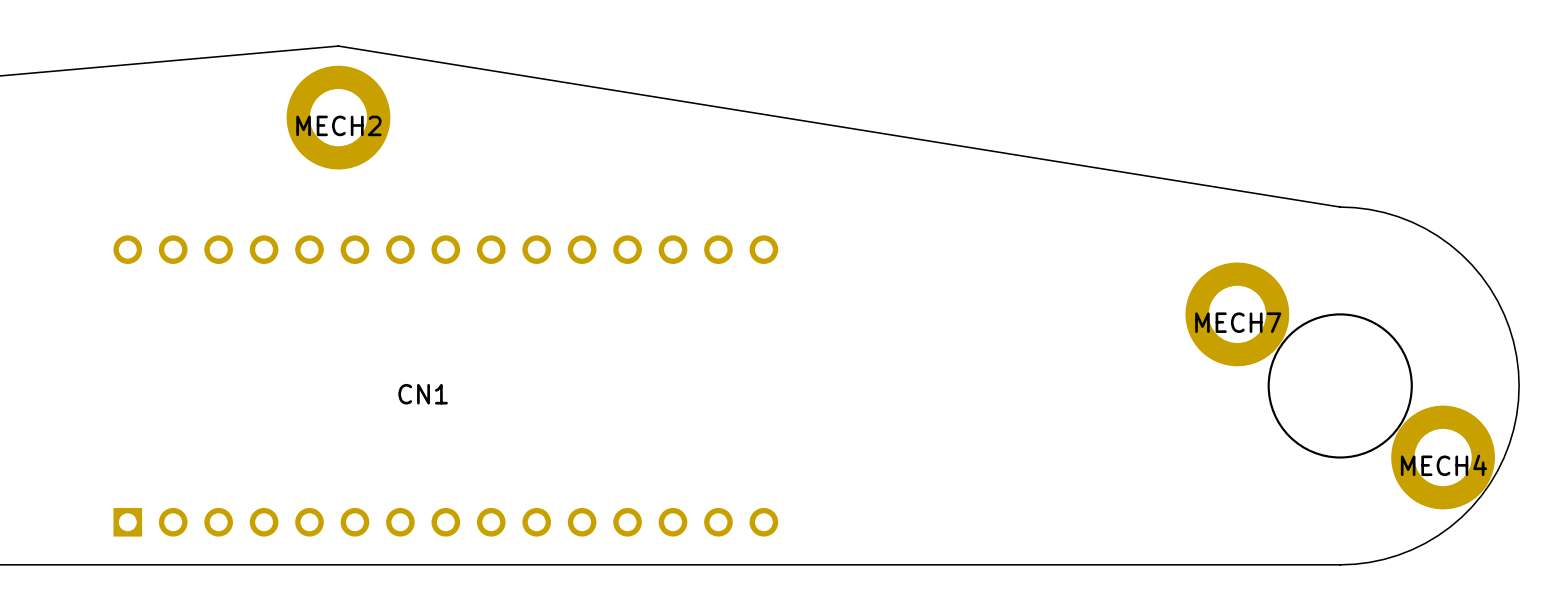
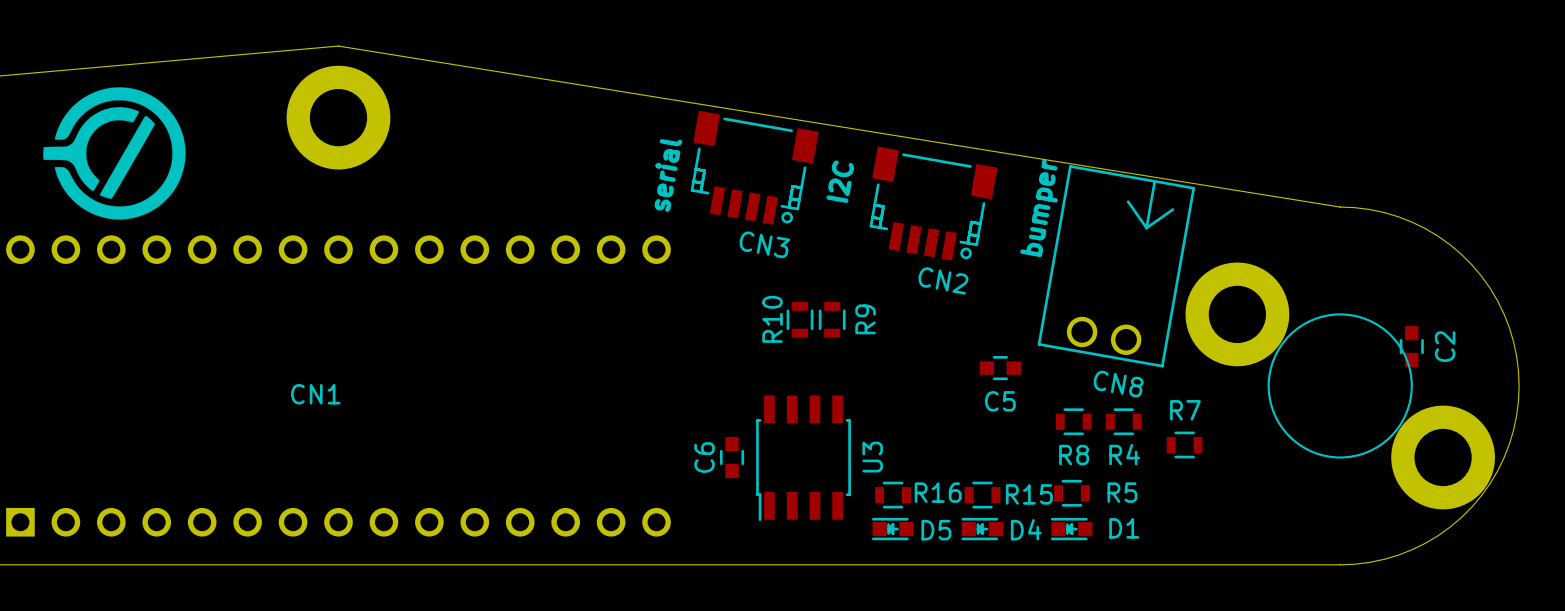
drawing: none -> [43, 87, 186, 220]
MECH2 name: MECH2 (338, 125) -> none
CN3: none -> (754, 167)
text: none -> serial (668, 175)
text: none -> I2C (840, 181)
CN2: none -> (933, 203)
text: none -> bumper (1039, 208)
CN8: none -> (1116, 266)
R10: none -> (800, 319)
R9: none -> (832, 319)
MECH7 name: MECH7 (1238, 322) -> none
C2: none -> (1411, 346)
C5: none -> (1000, 368)
CN1 position: (445, 385) -> (338, 385)
R8: none -> (1073, 421)
R4: none -> (1123, 421)
R7: none -> (1184, 444)
C6: none -> (732, 457)
U3: none -> (803, 458)
MECH4 name: MECH4 (1443, 465) -> none
R5: none -> (1071, 493)
R16: none -> (893, 495)
R15: none -> (982, 495)
D5: none -> (892, 529)
D4: none -> (982, 529)
D1: none -> (1071, 529)

